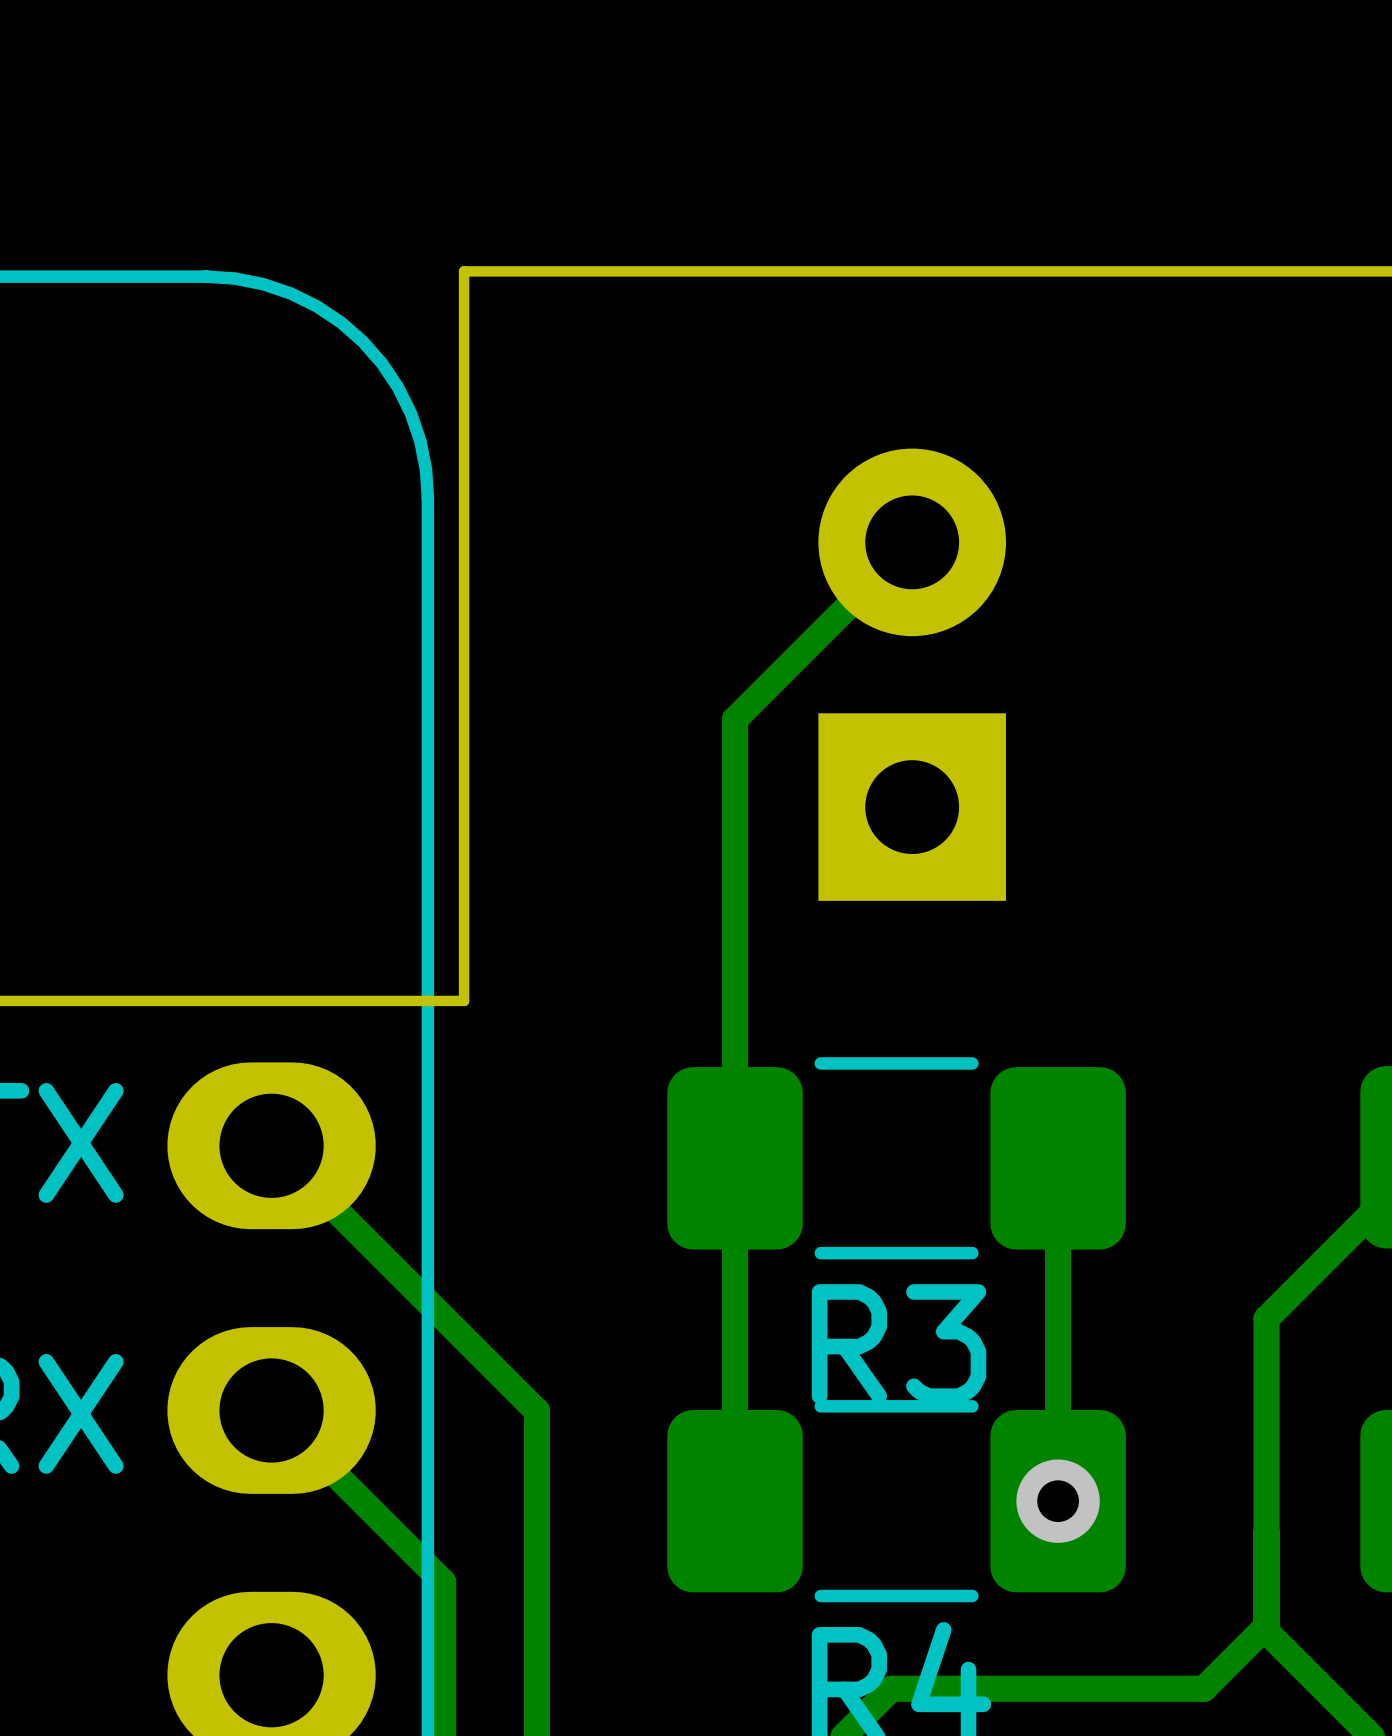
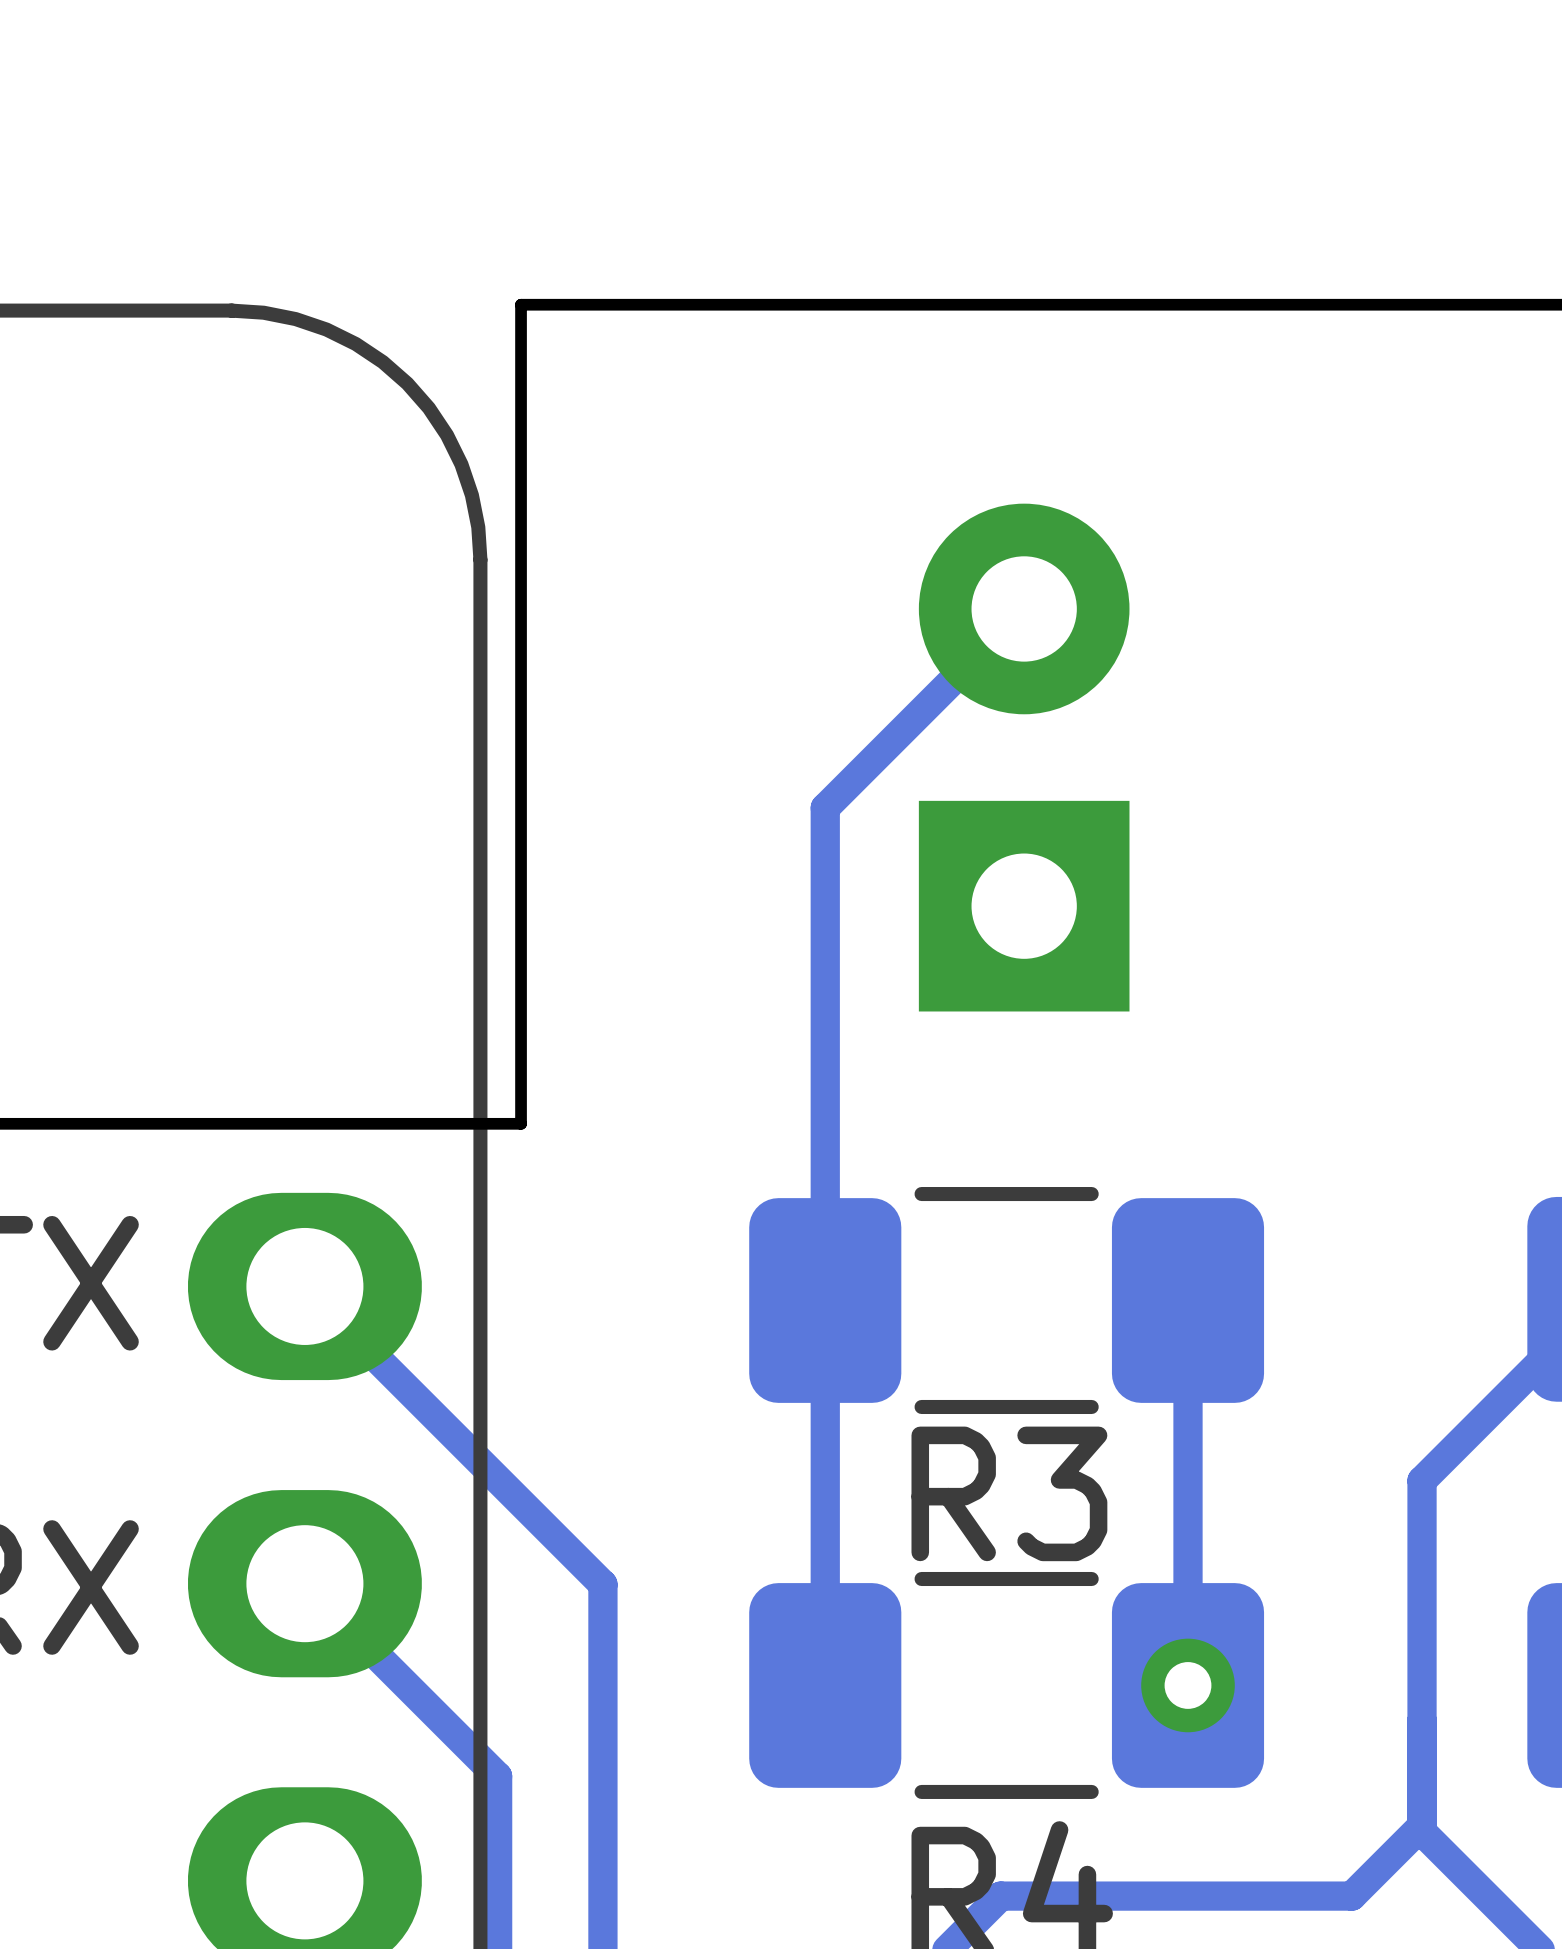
R3 name position: R3 (899, 1344) -> R3 (1009, 1493)

